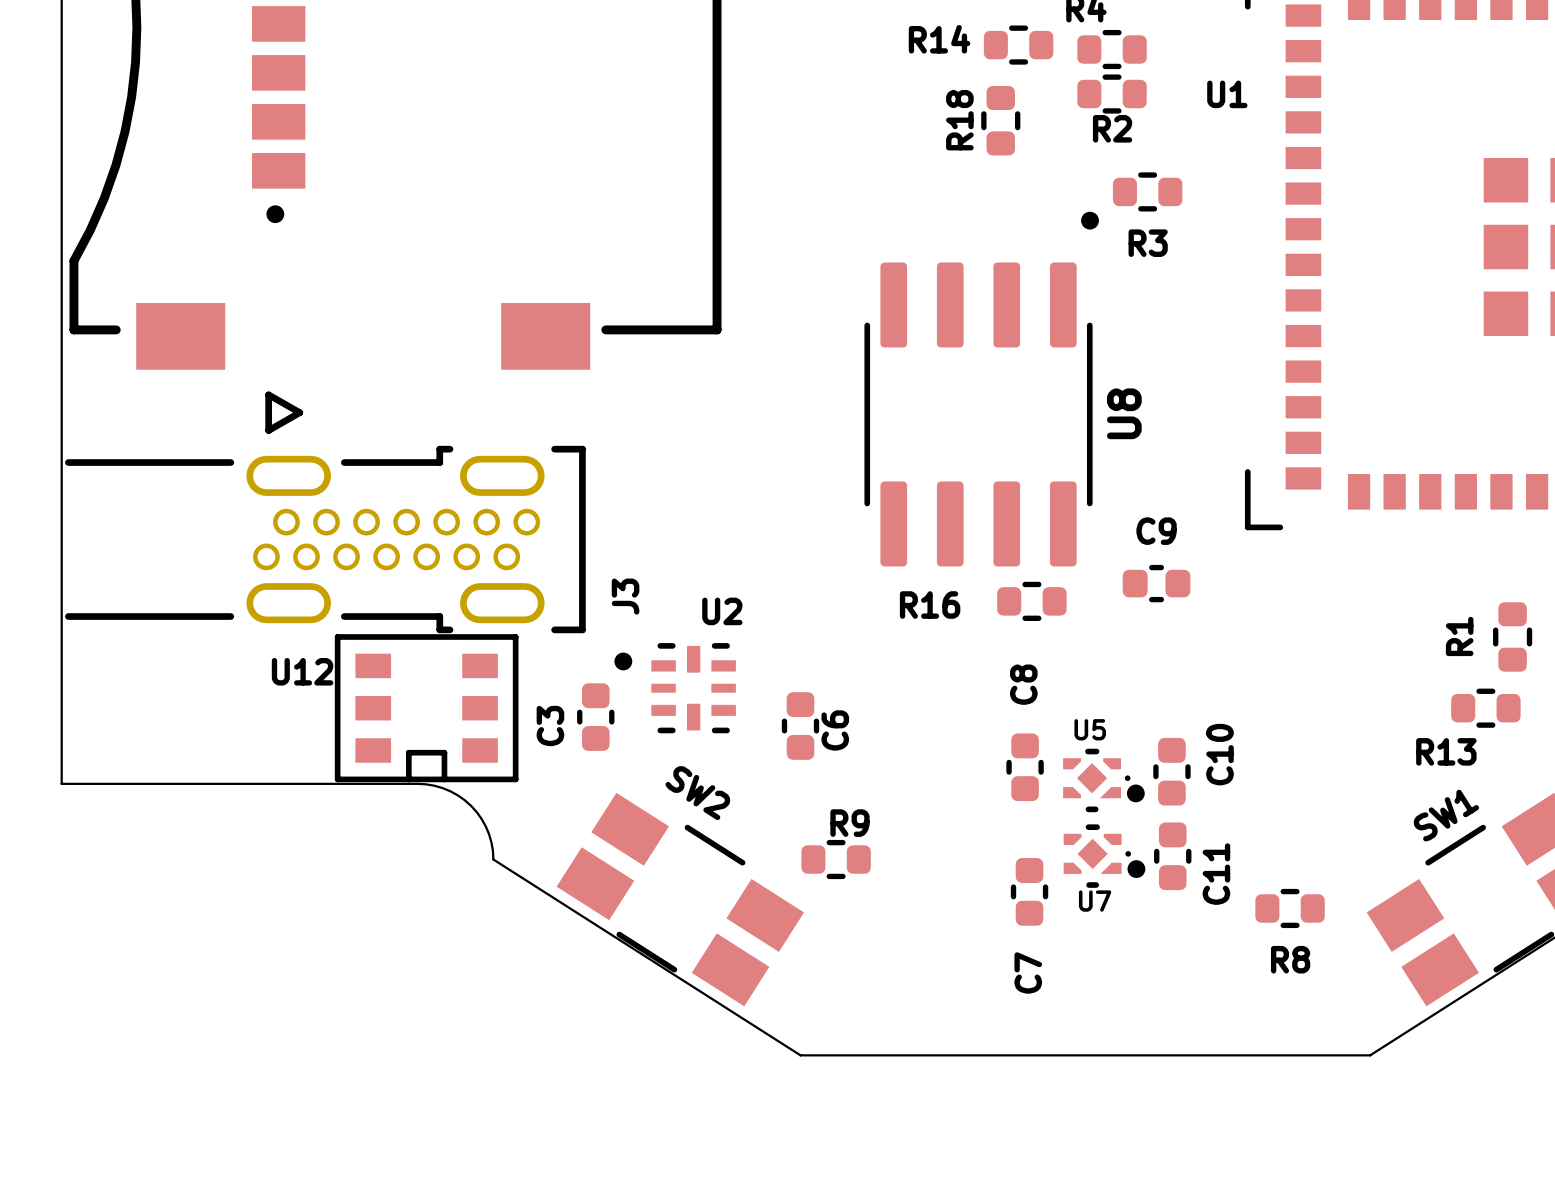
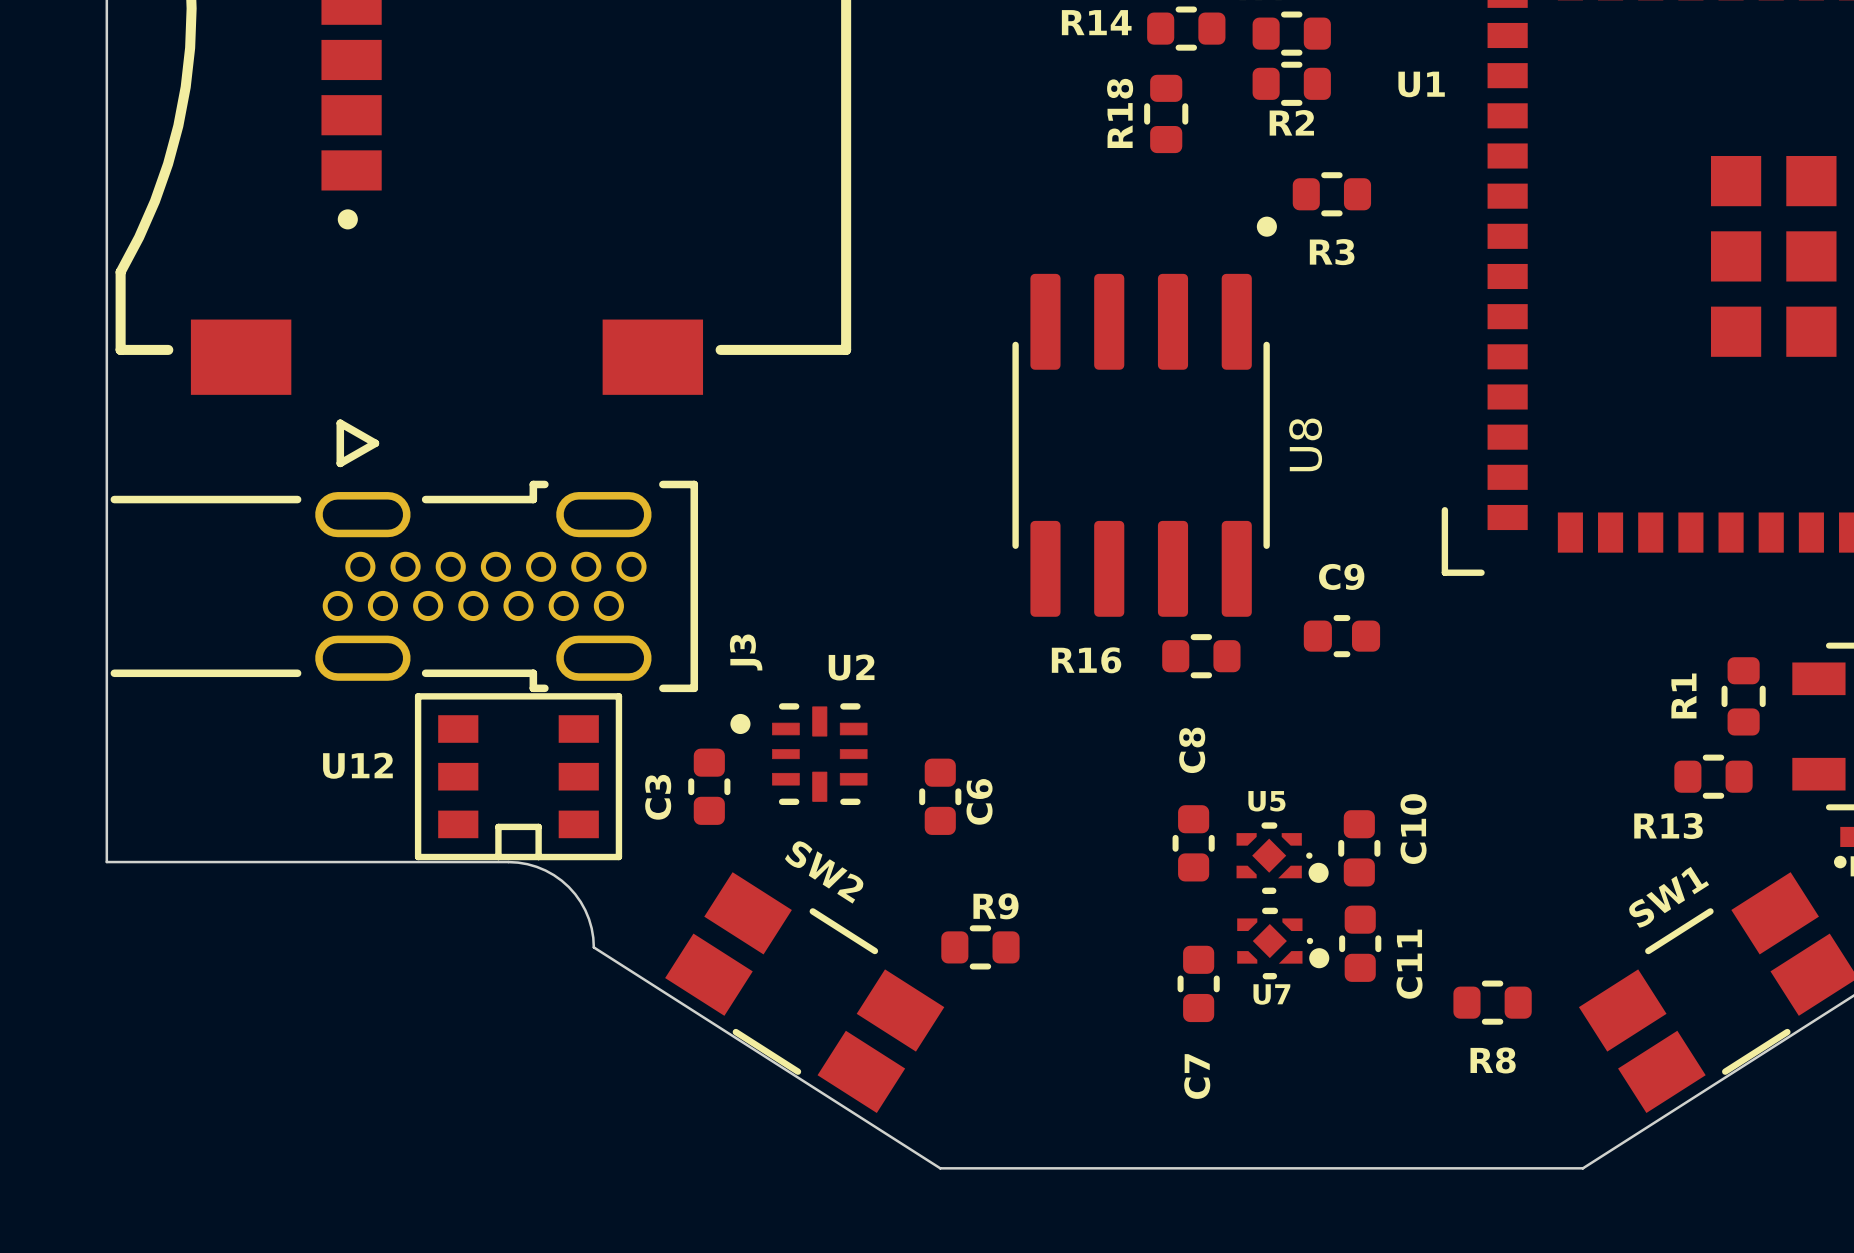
U12 name position: U12 (302, 671) -> U12 (357, 765)

